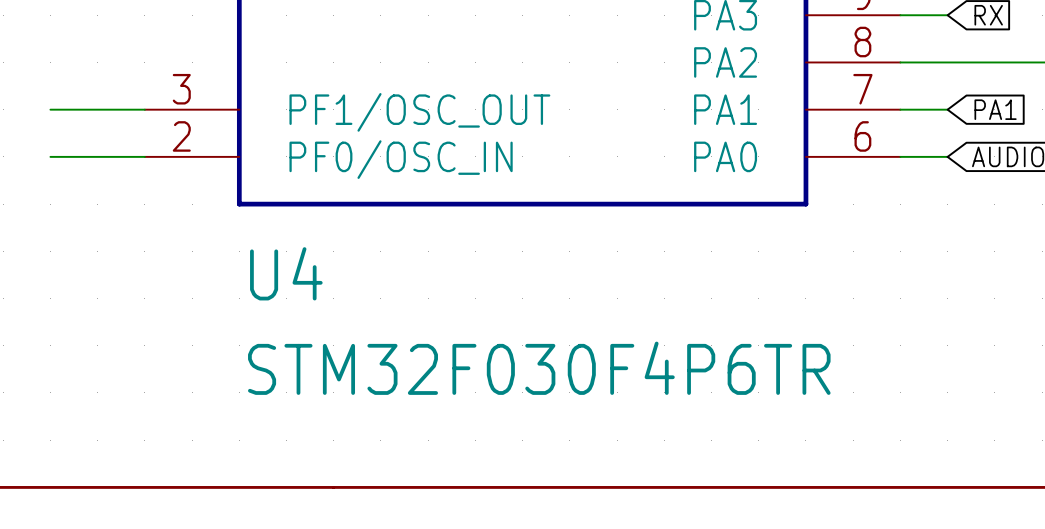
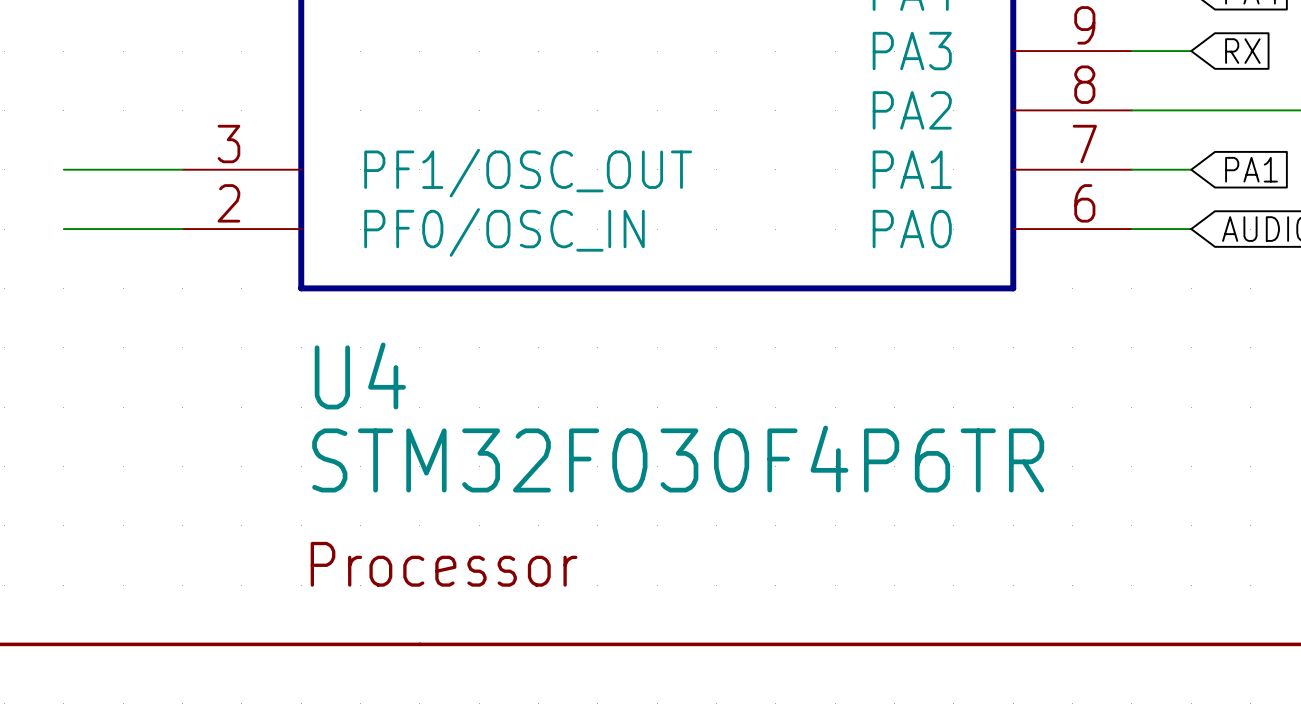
U4 value position: STM32F030F4P6TR (539, 368) -> STM32F030F4P6TR (678, 459)
text: none -> Processor (444, 564)

